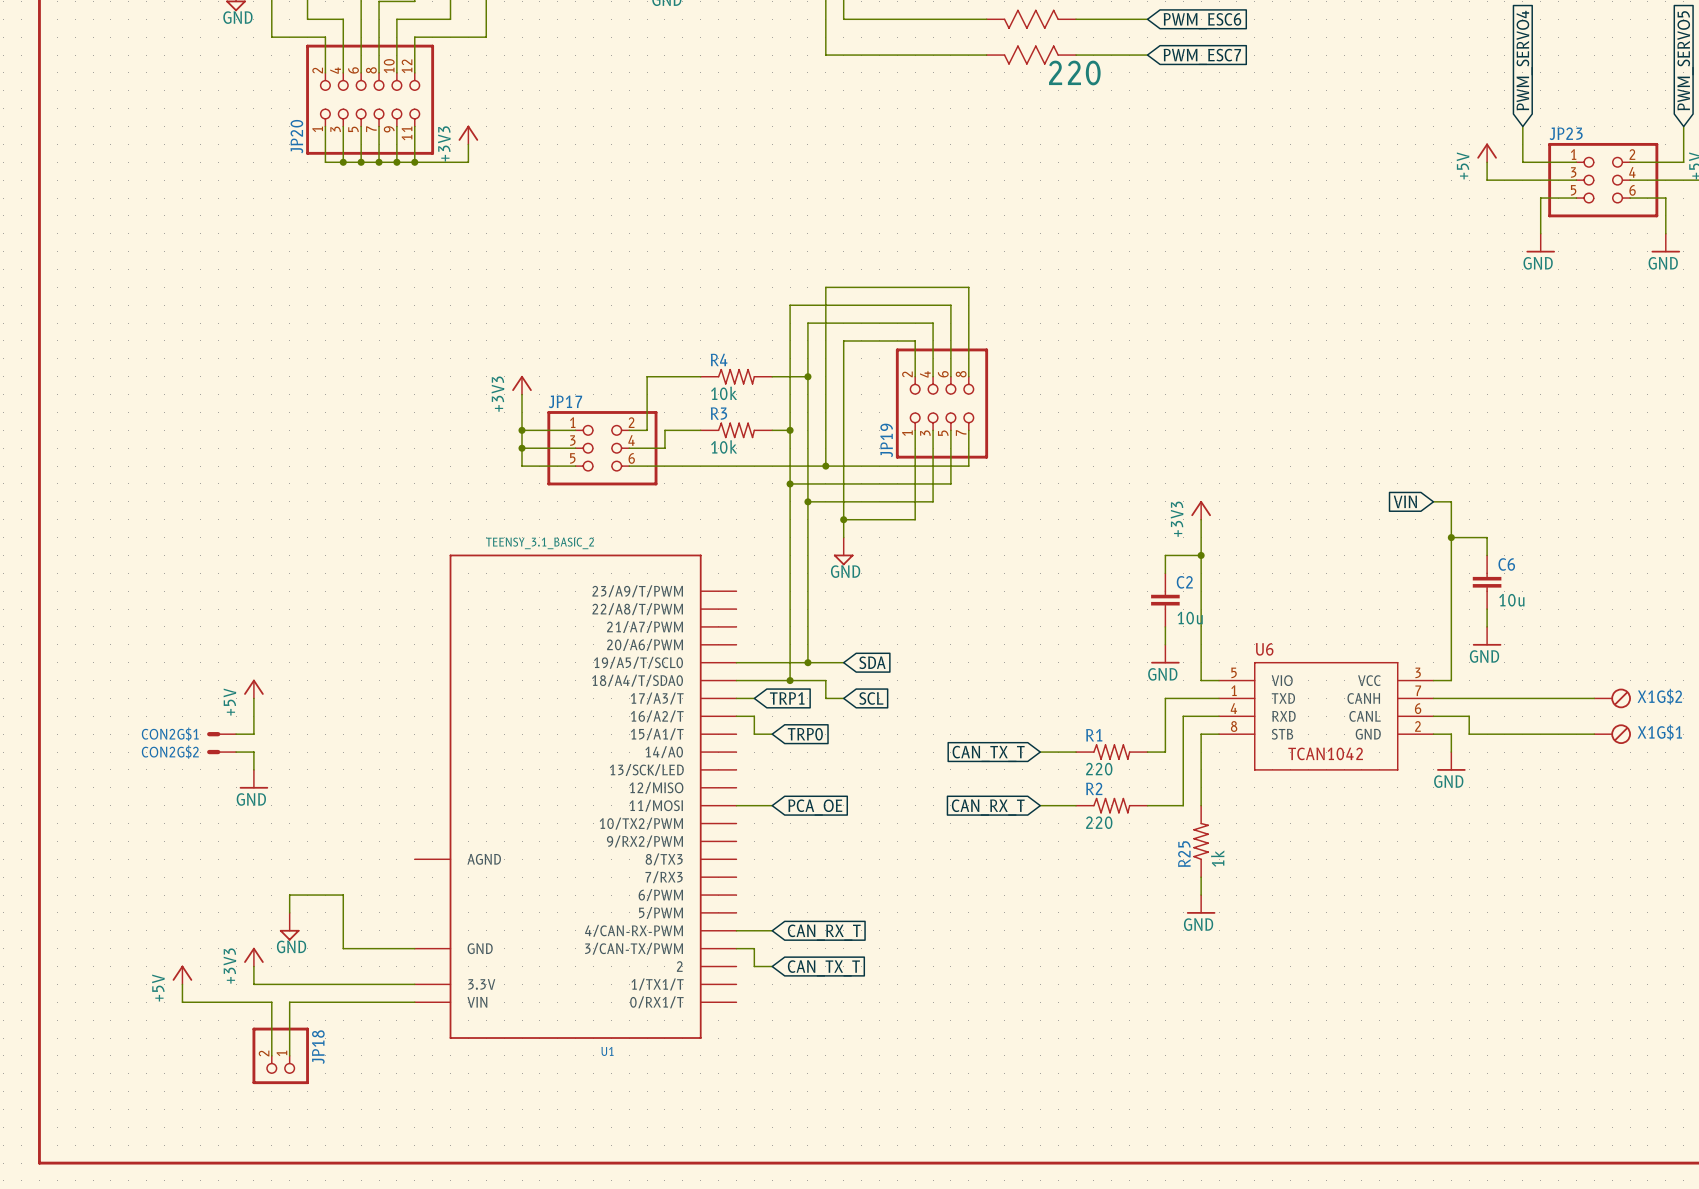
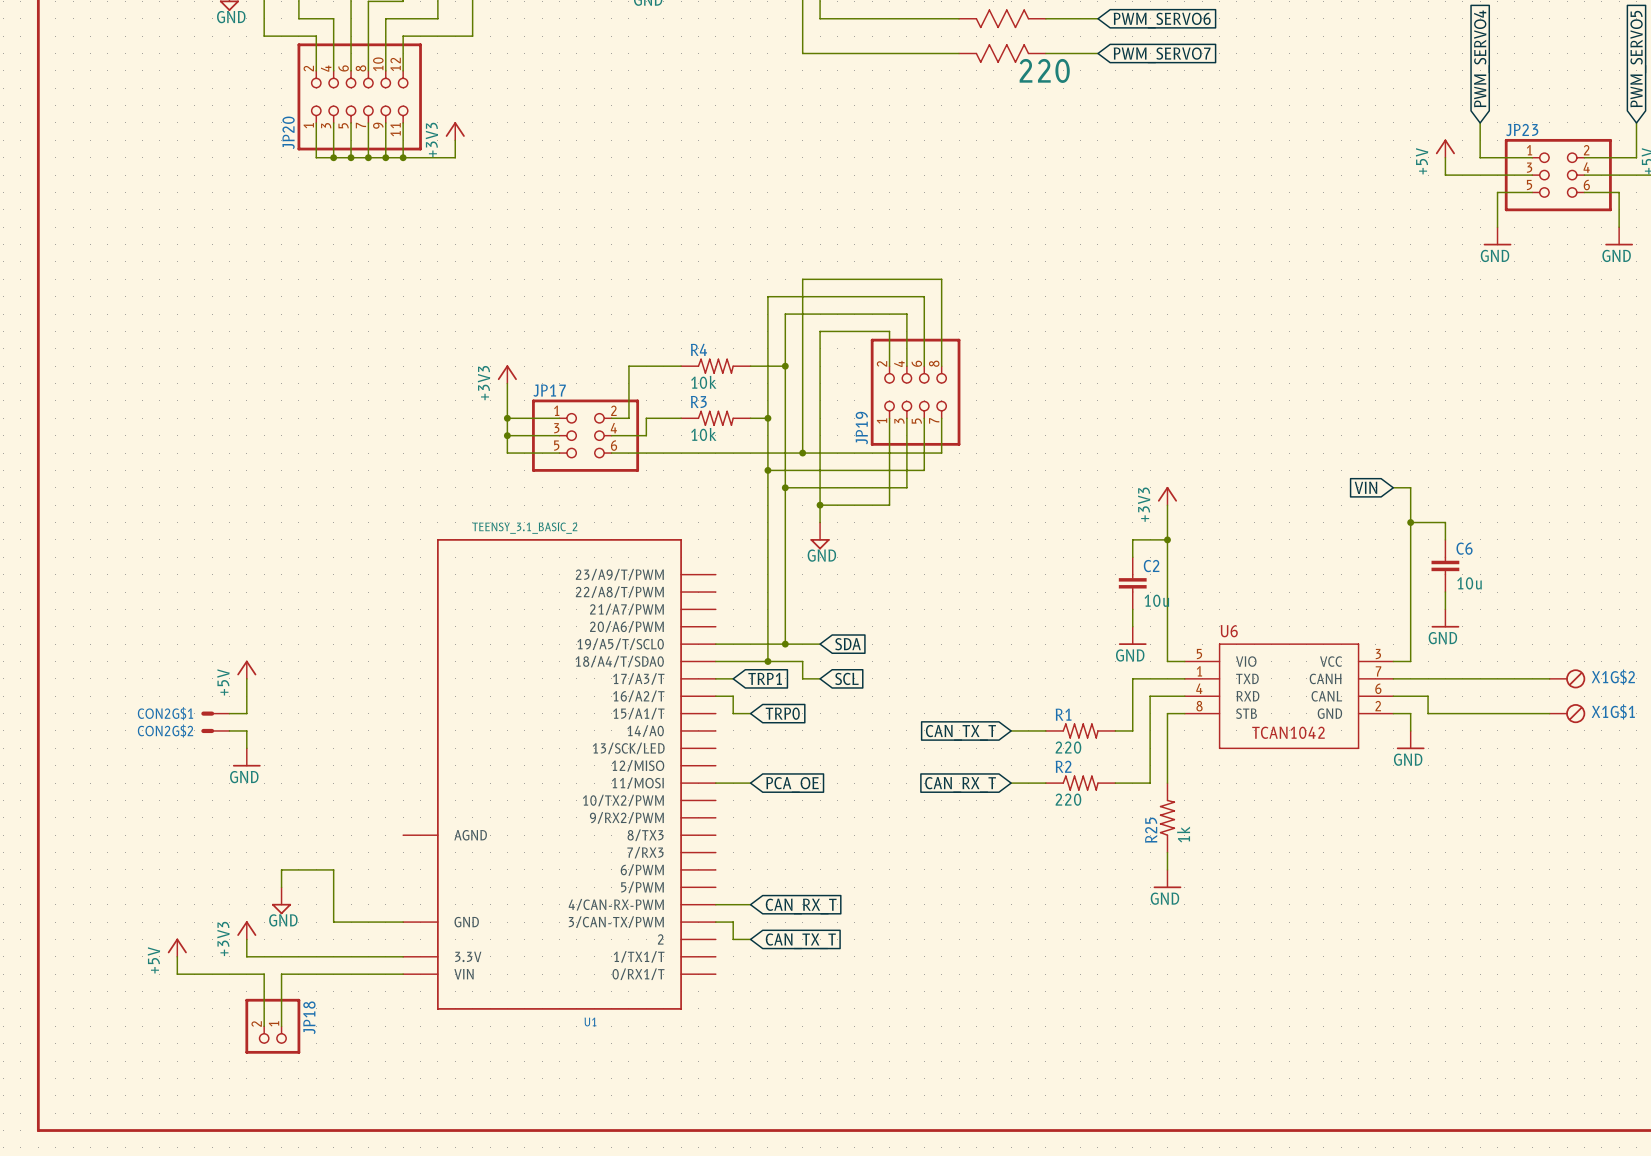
wire: (1129, 19) (1147, 19) -> none
global label: PWM_ESC6 (1202, 21) -> PWM_SERVO6 (1162, 20)
wire: (1129, 55) (1147, 55) -> none
global label: PWM_ESC7 (1202, 56) -> PWM_SERVO7 (1162, 55)

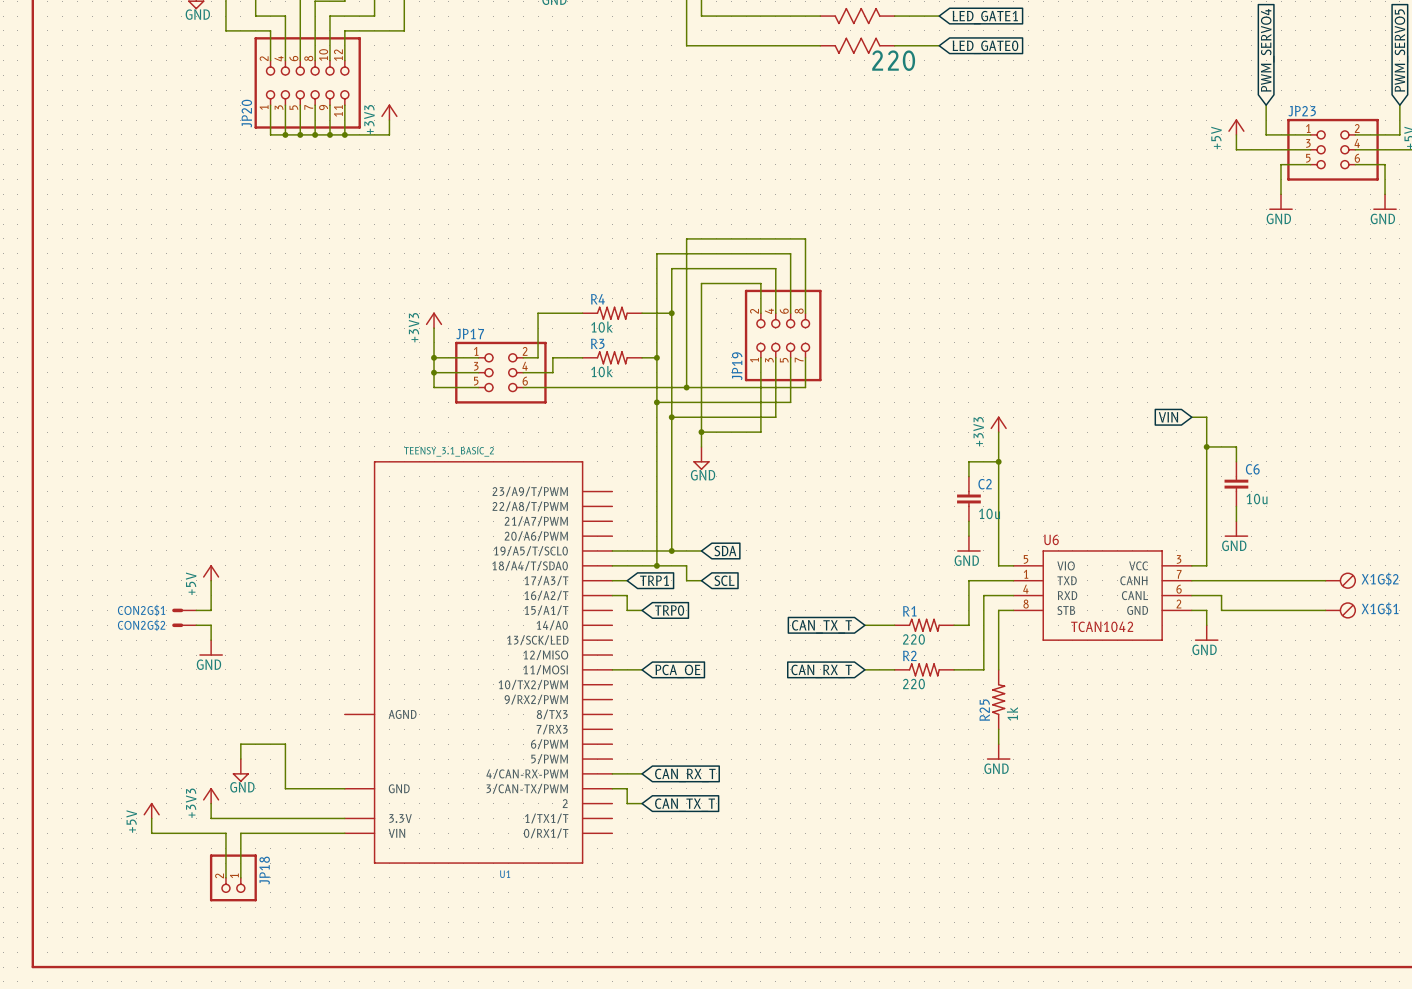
global label: PWM_SERVO6 (1162, 20) -> LED_GATE1 (985, 17)
global label: PWM_SERVO7 (1162, 55) -> LED_GATE0 (985, 47)

